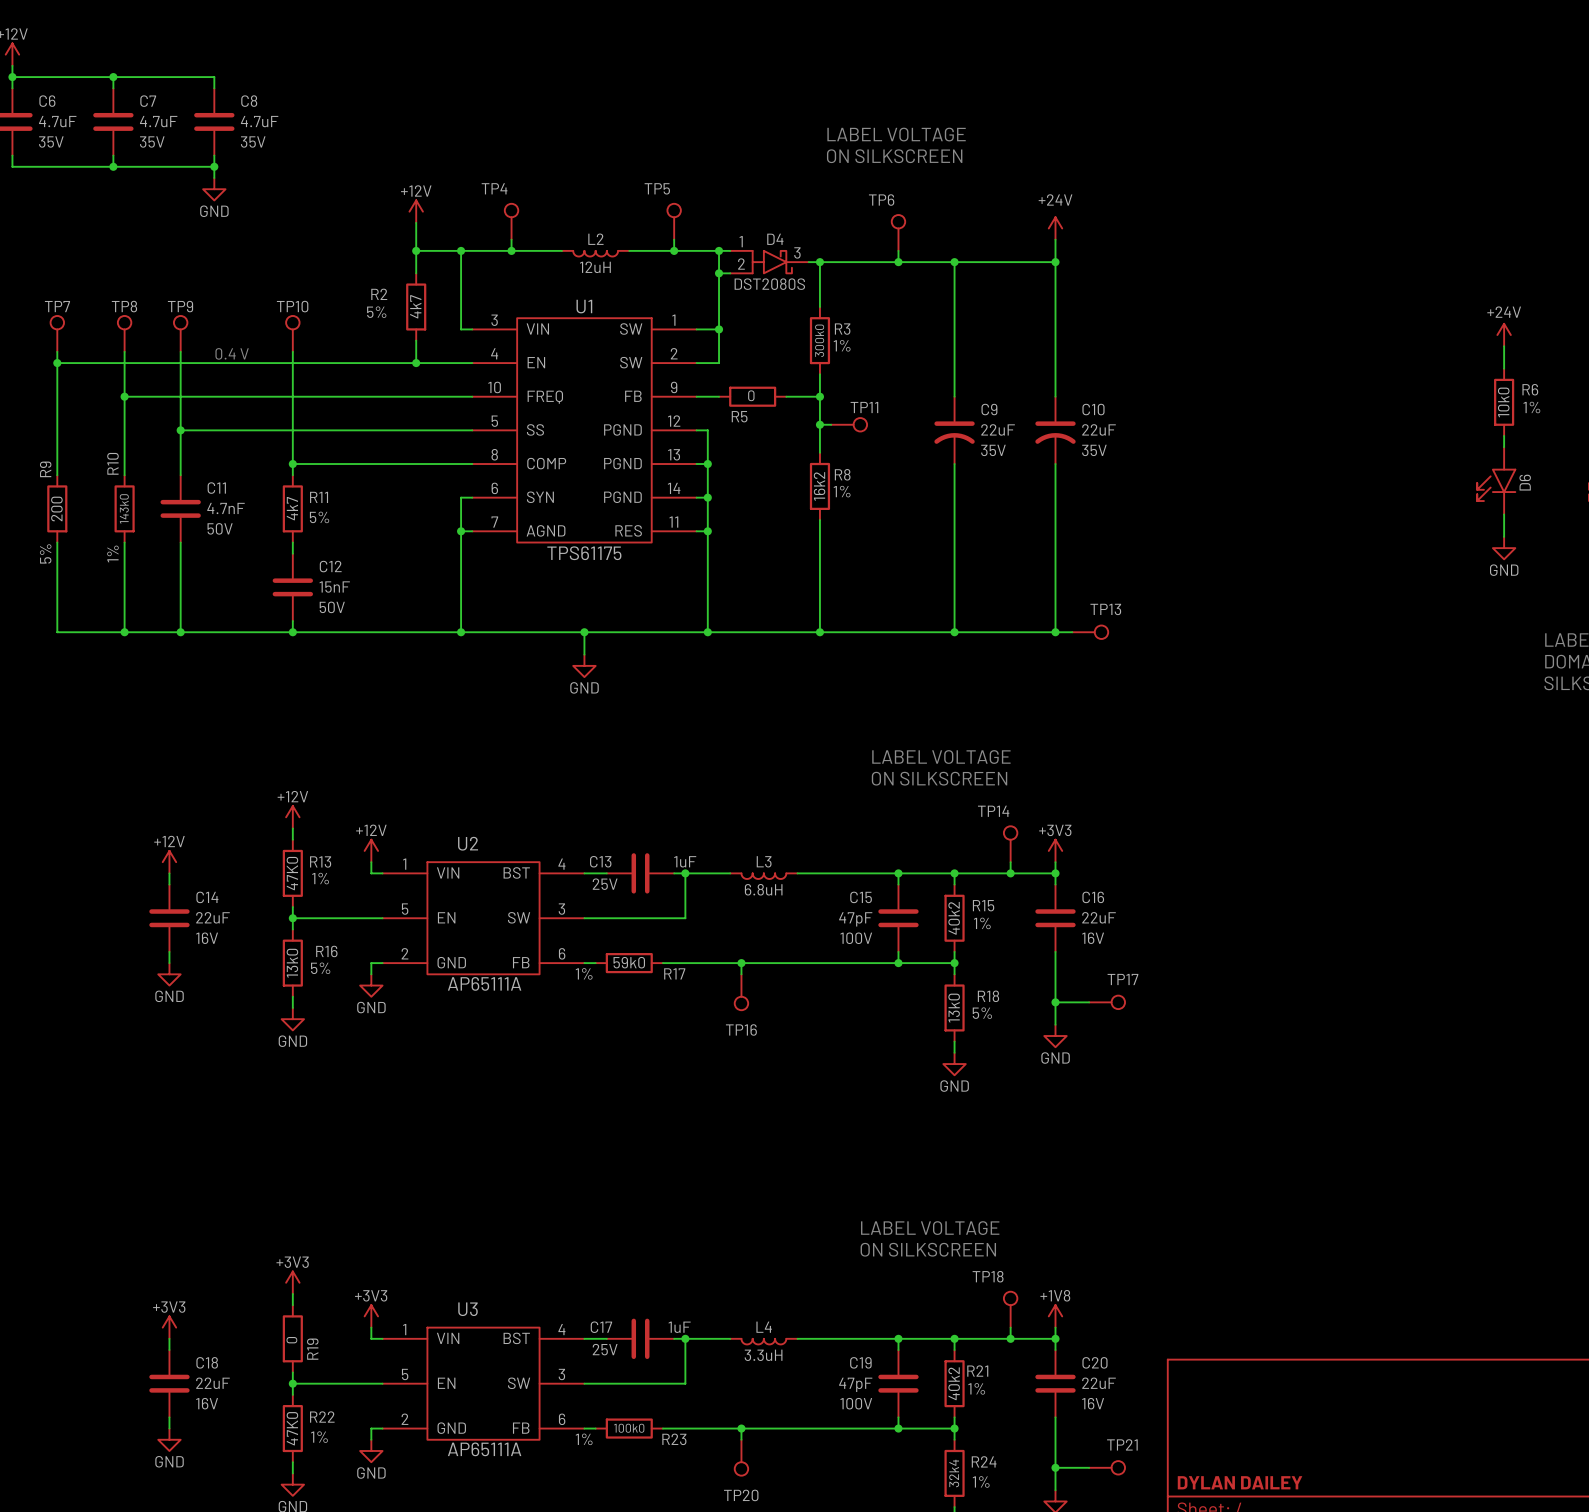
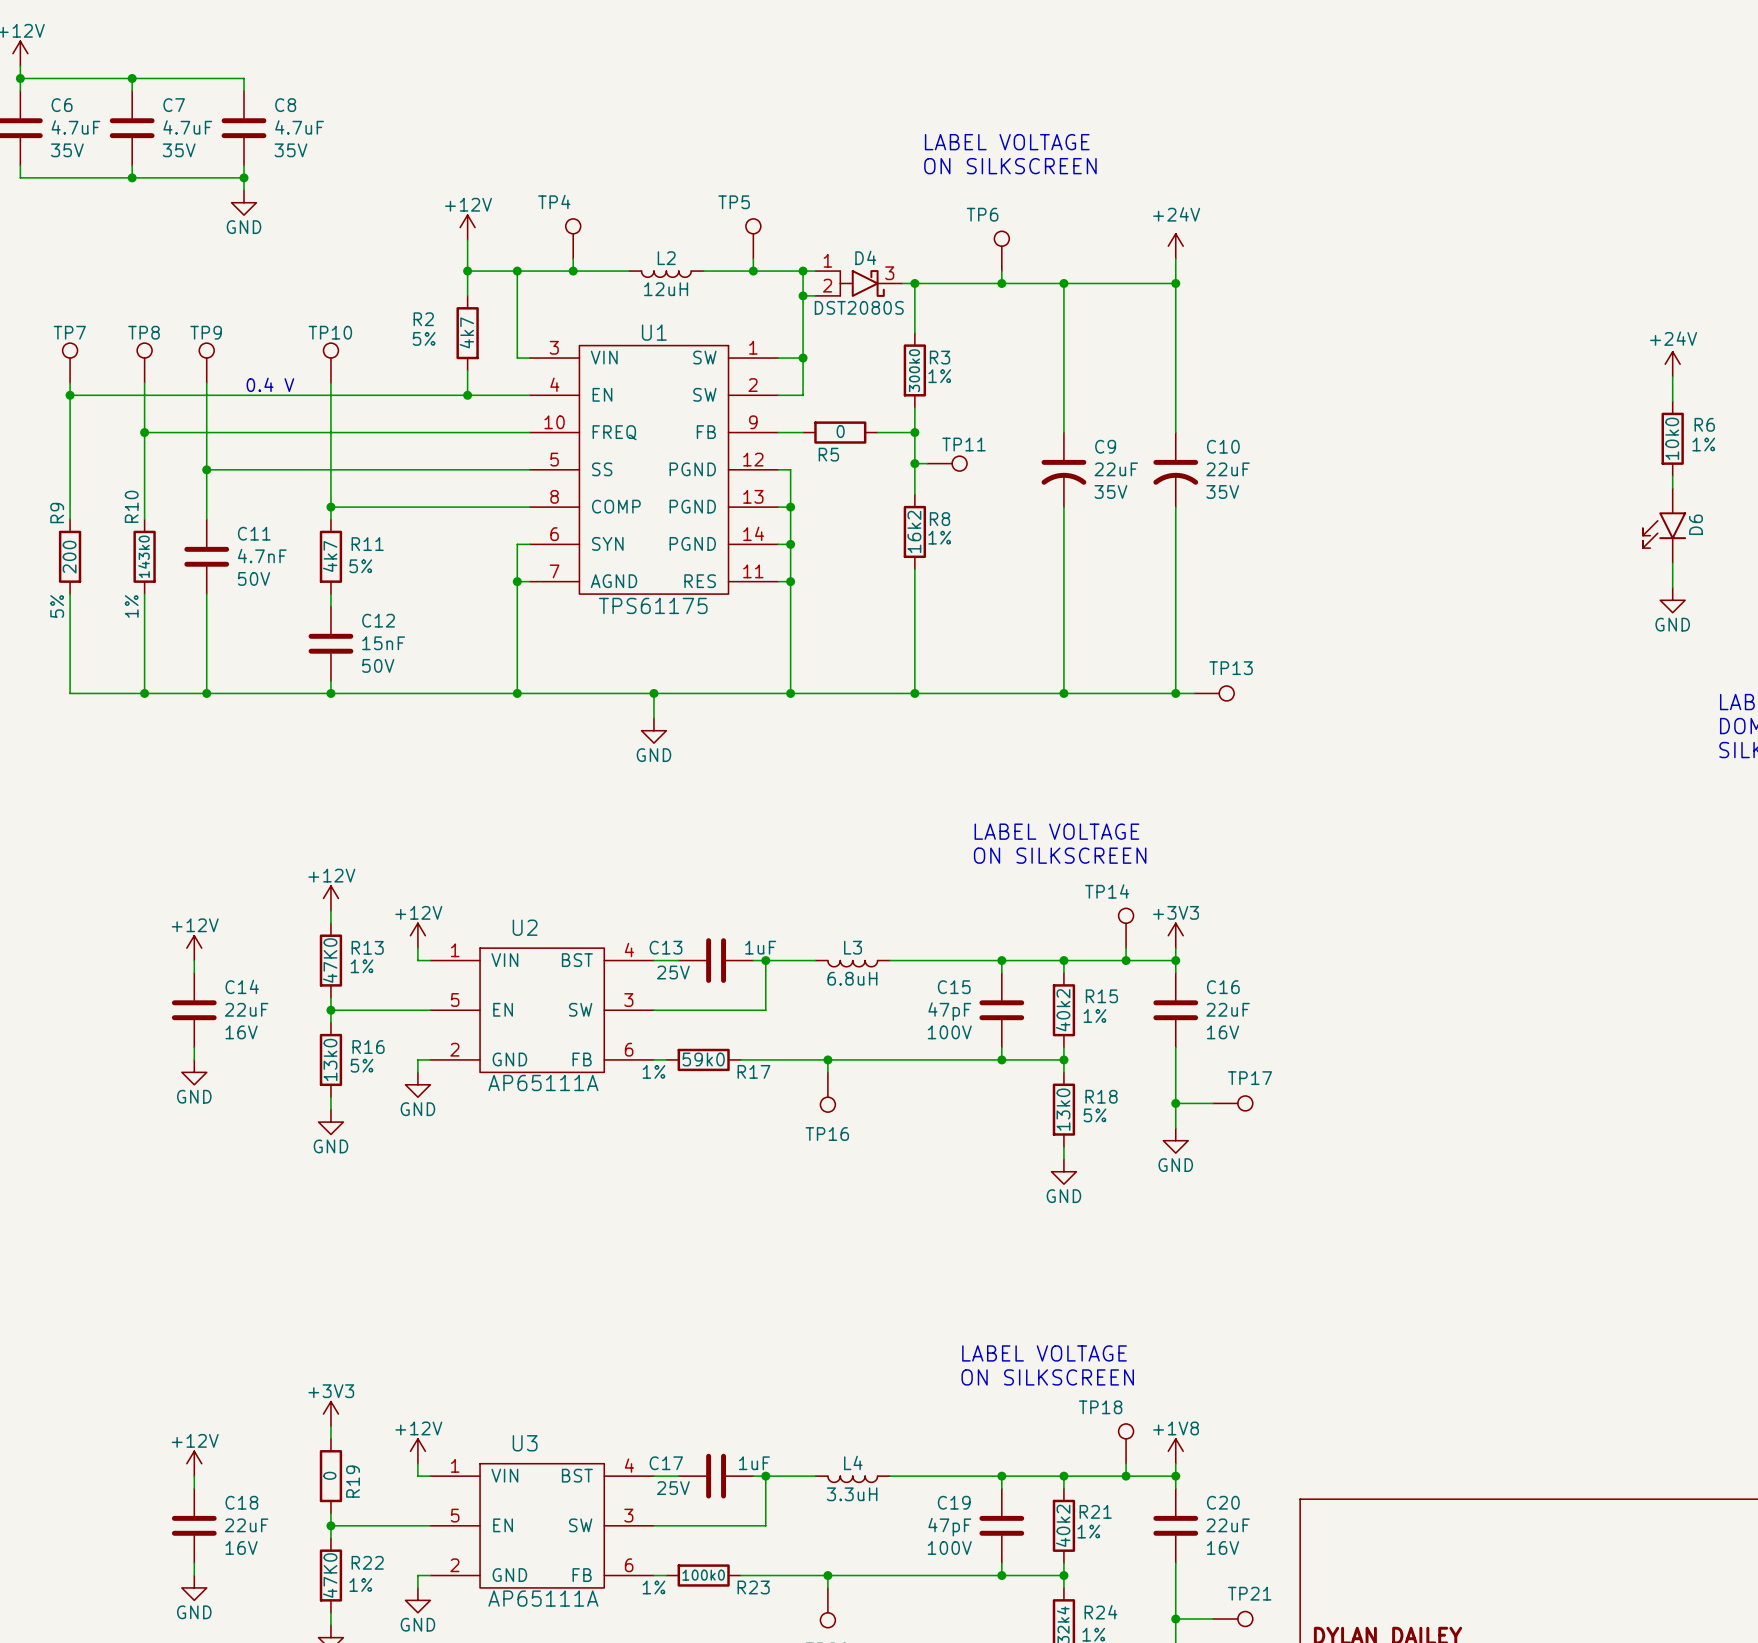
power symbol: +3V3 (371, 1316) -> +12V (417, 1451)
power symbol: +3V3 (169, 1327) -> +12V (194, 1463)

